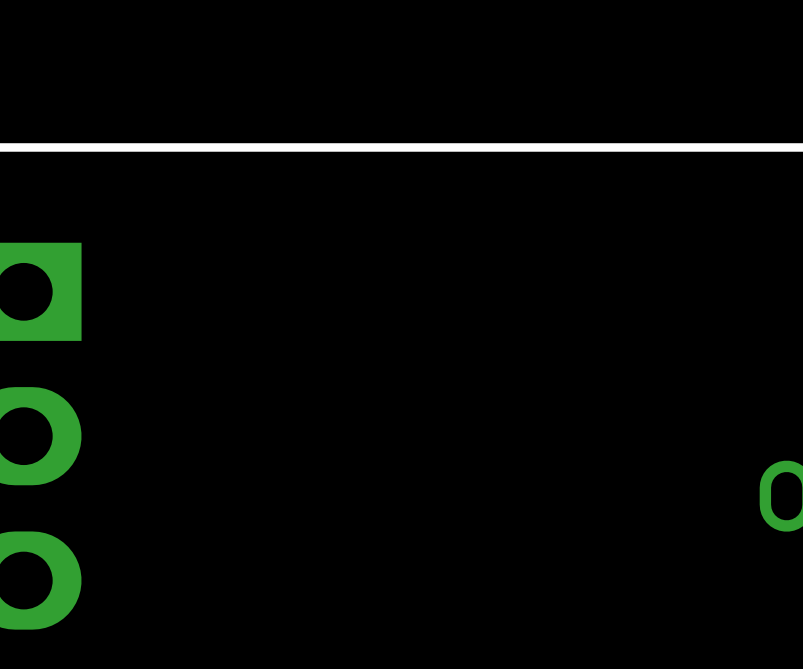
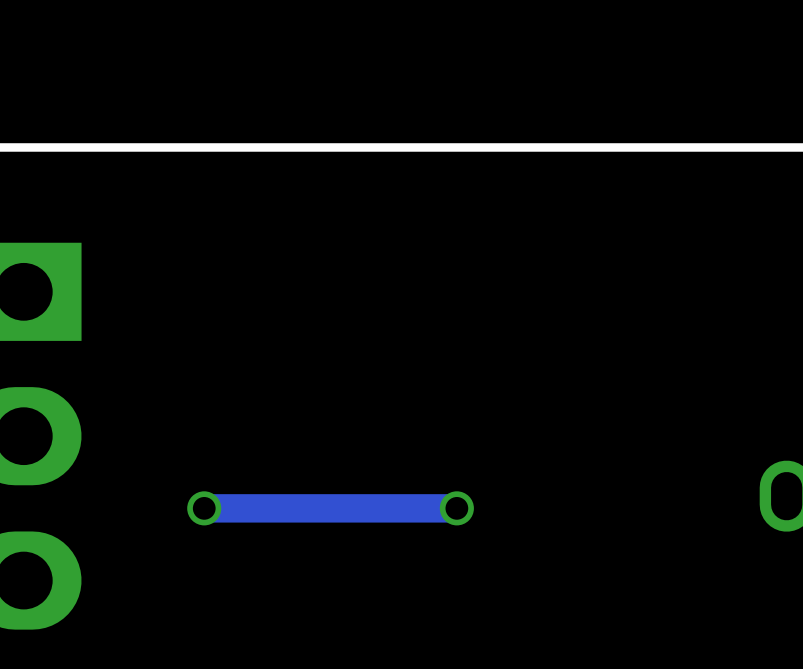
via: none -> (204, 508)
track: none -> (456, 508) (204, 508)
via: none -> (456, 508)

